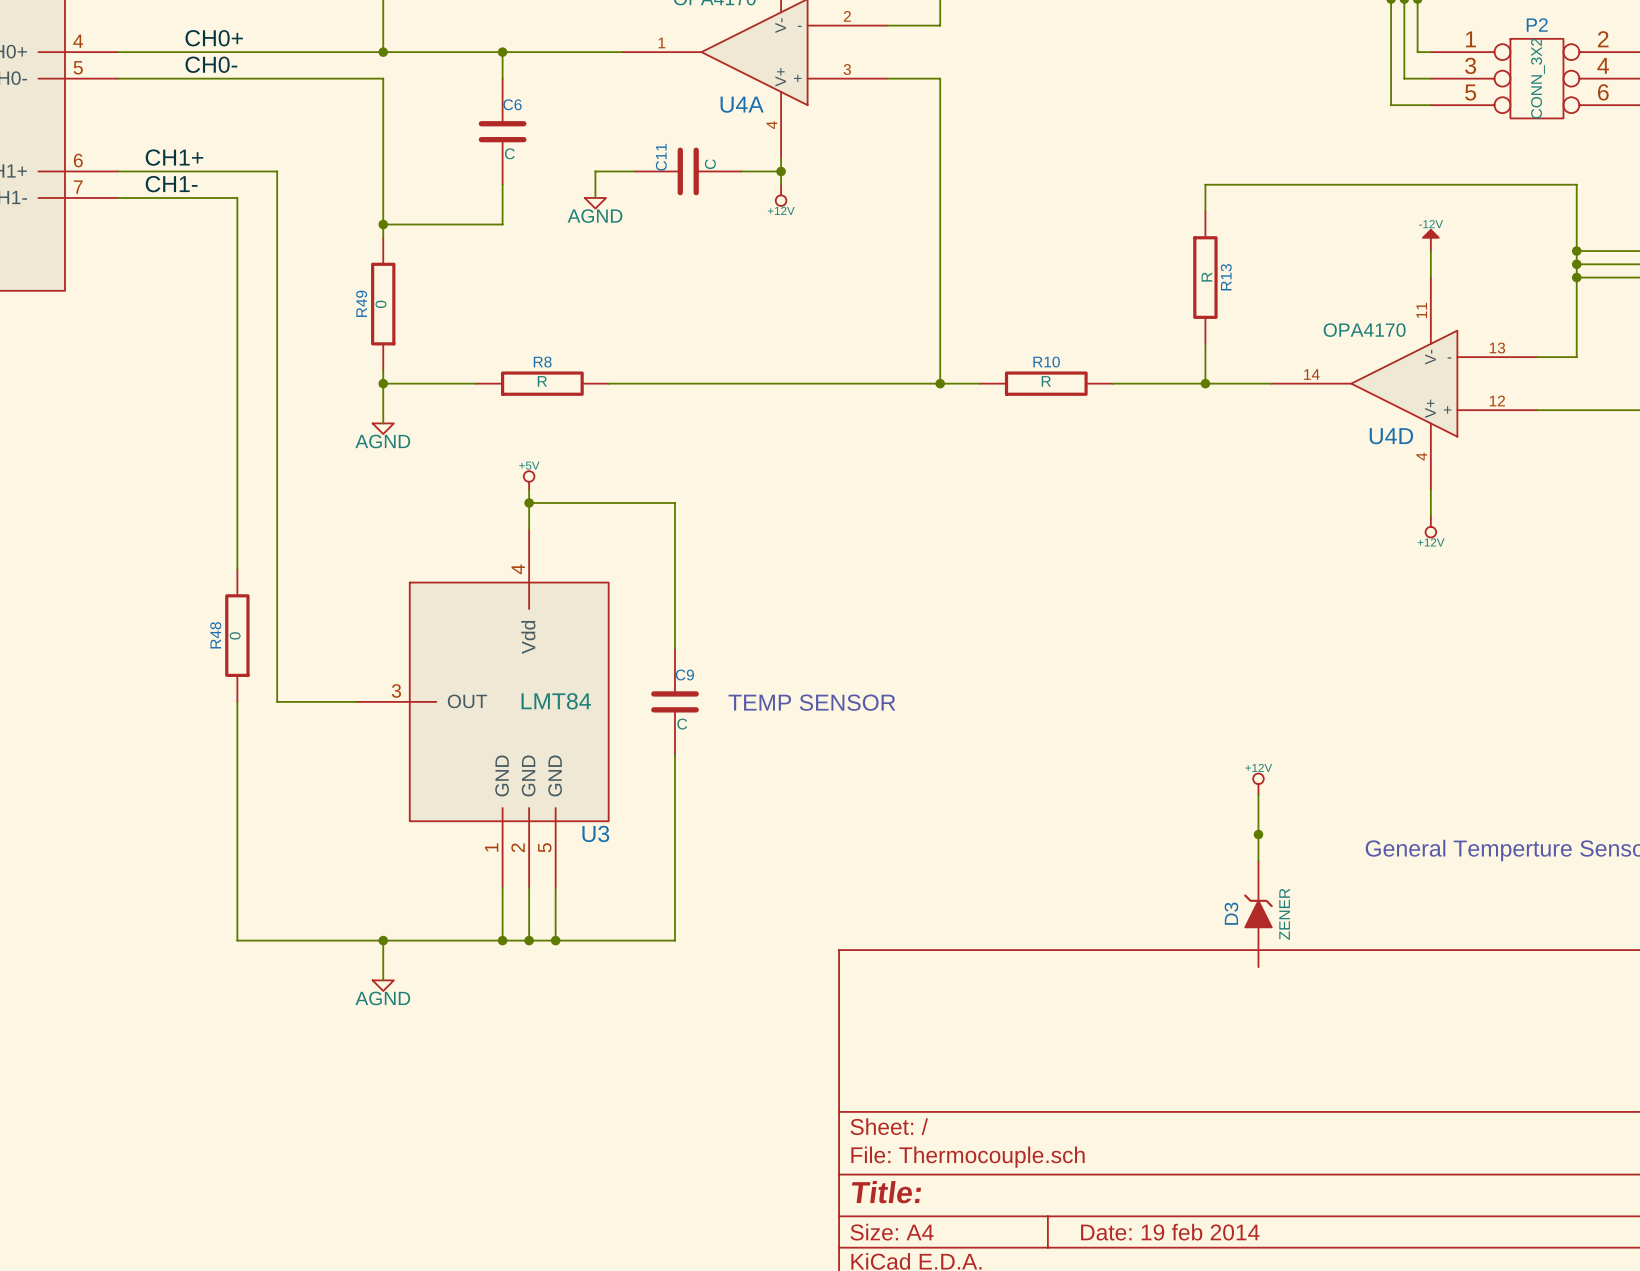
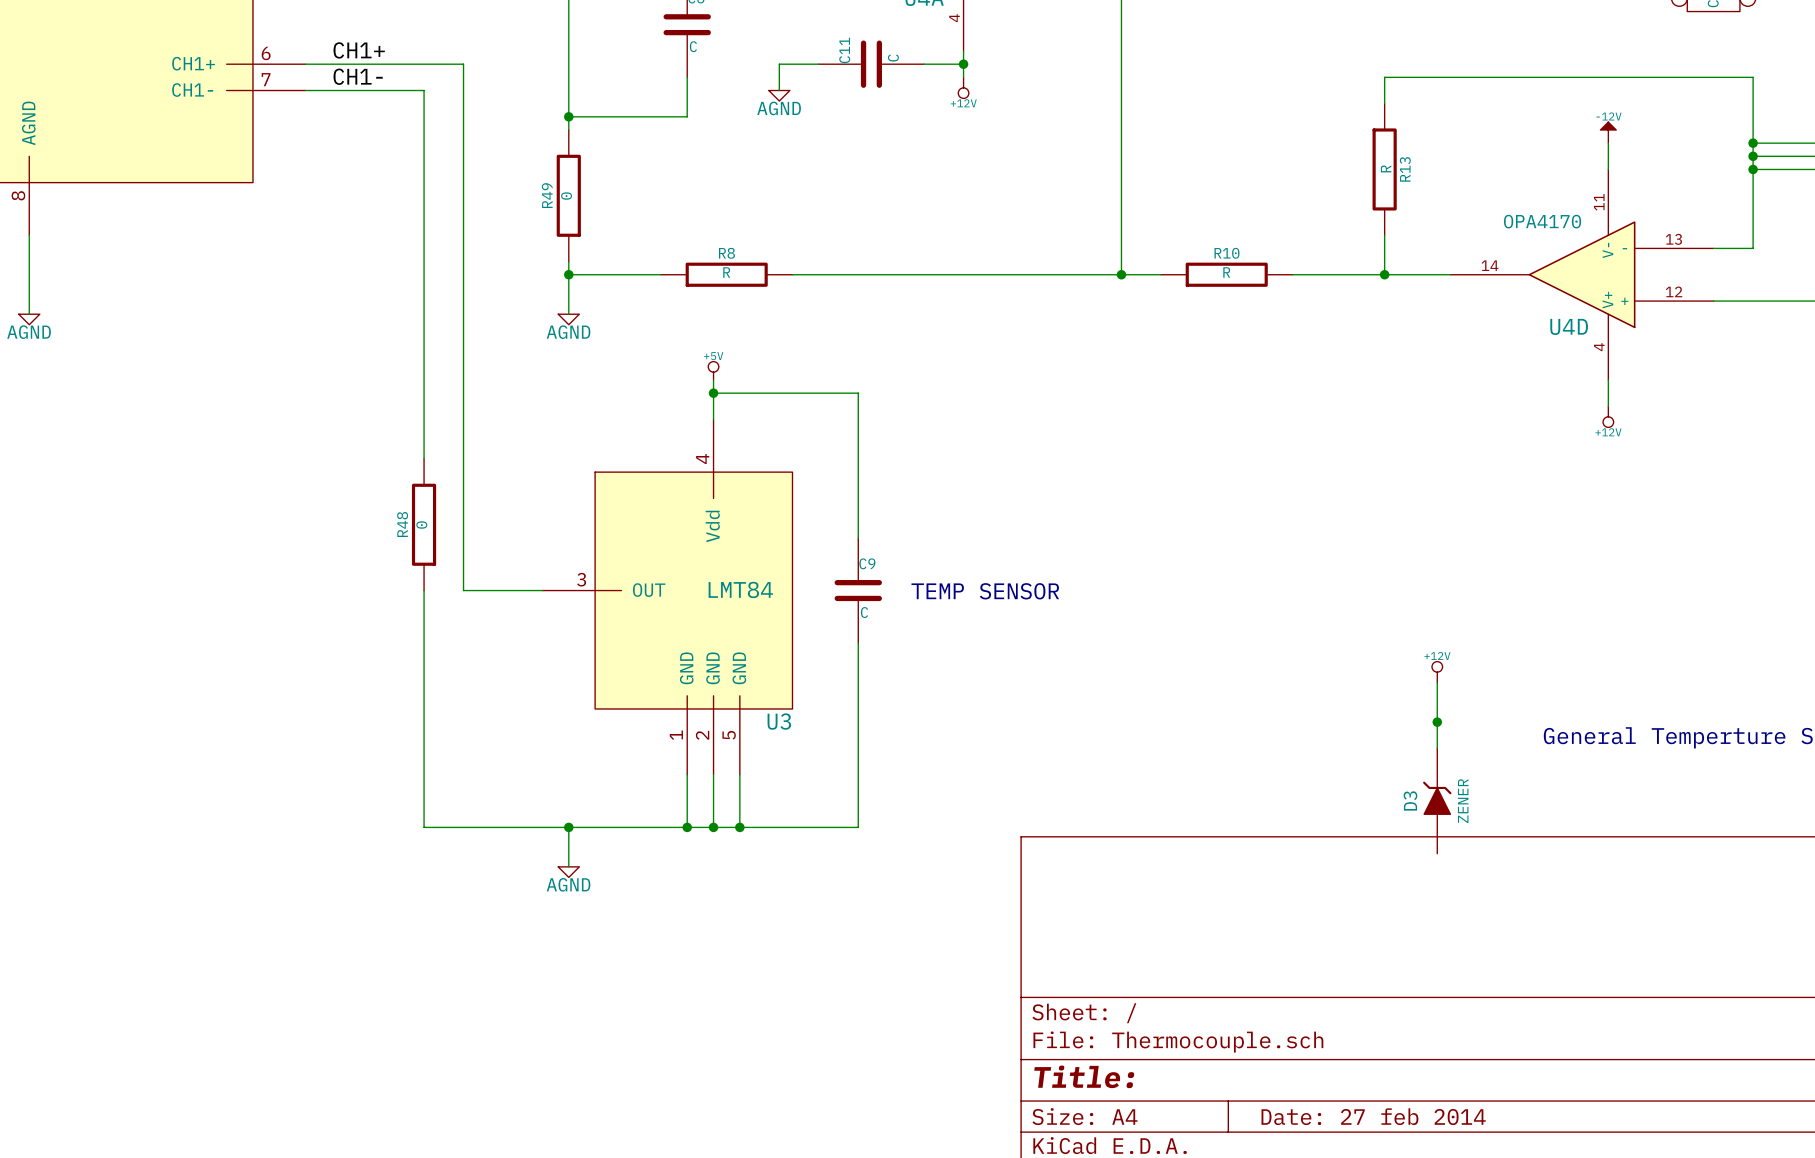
title block: Date: 19 feb 2014 (1170, 1232) -> Date: 27 feb 2014 (1373, 1116)

